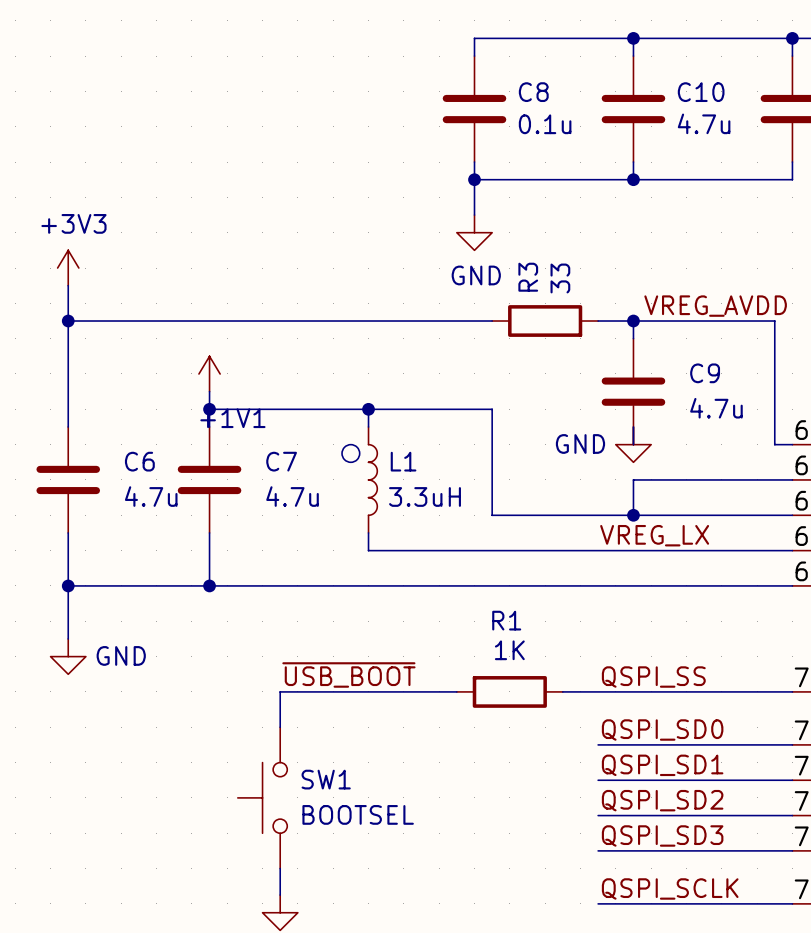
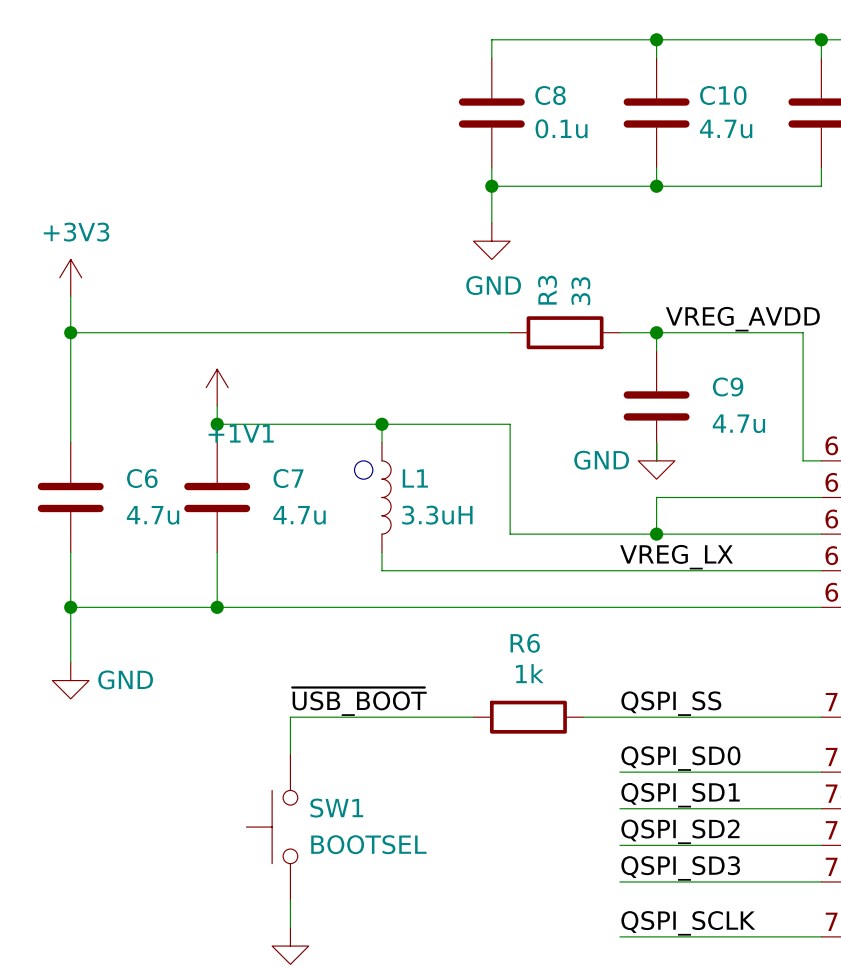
R1 name: R1 (506, 620) -> R6 (525, 643)
R1 value: 1K (509, 650) -> 1k (529, 673)

